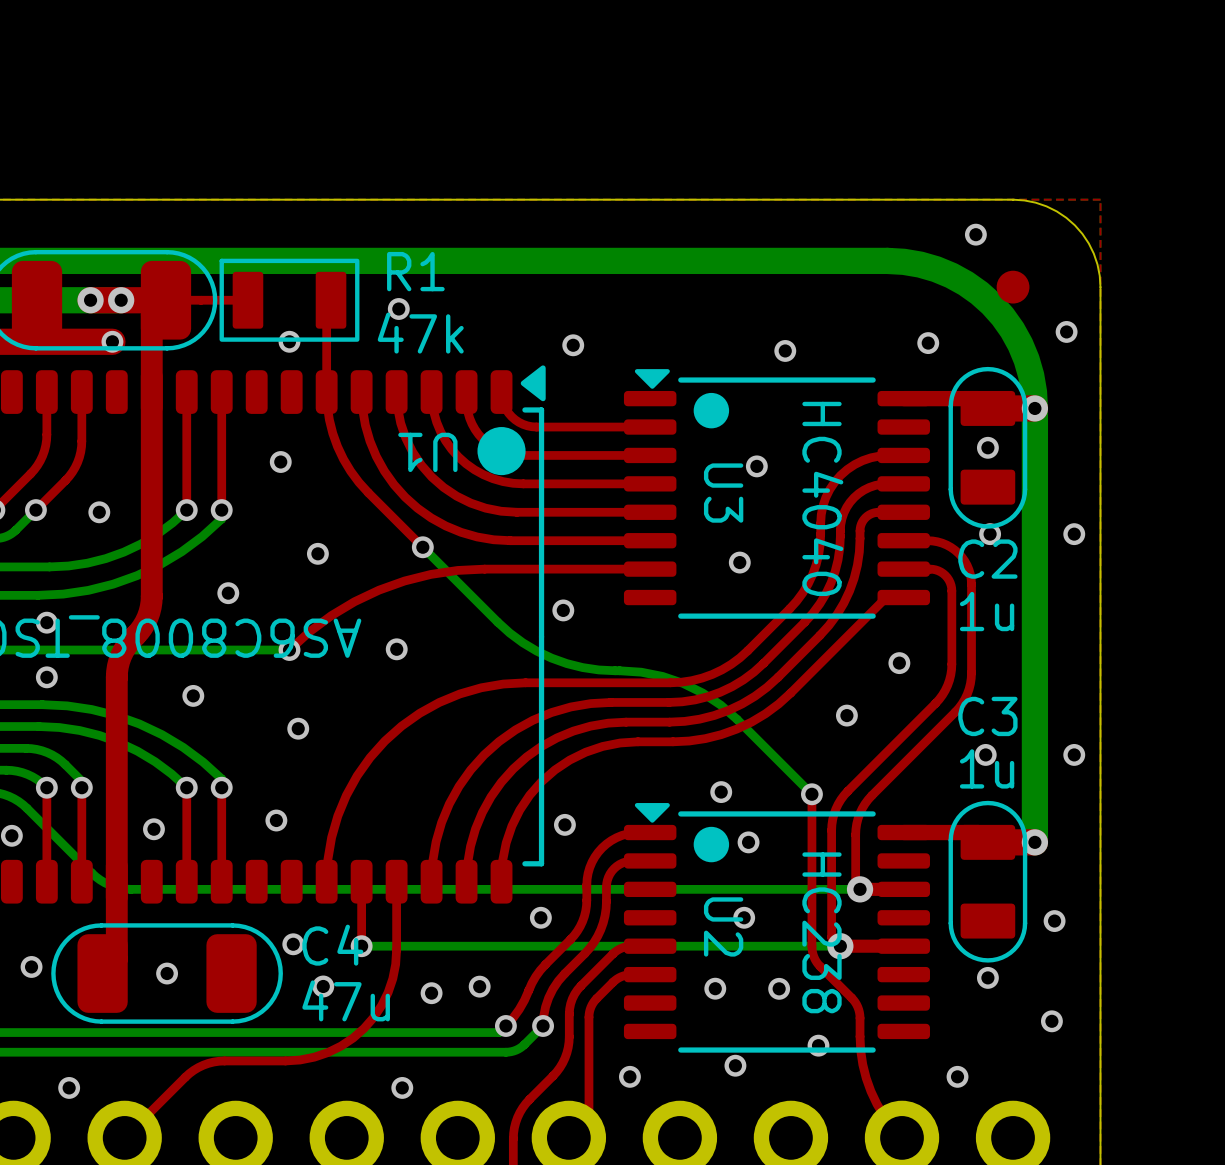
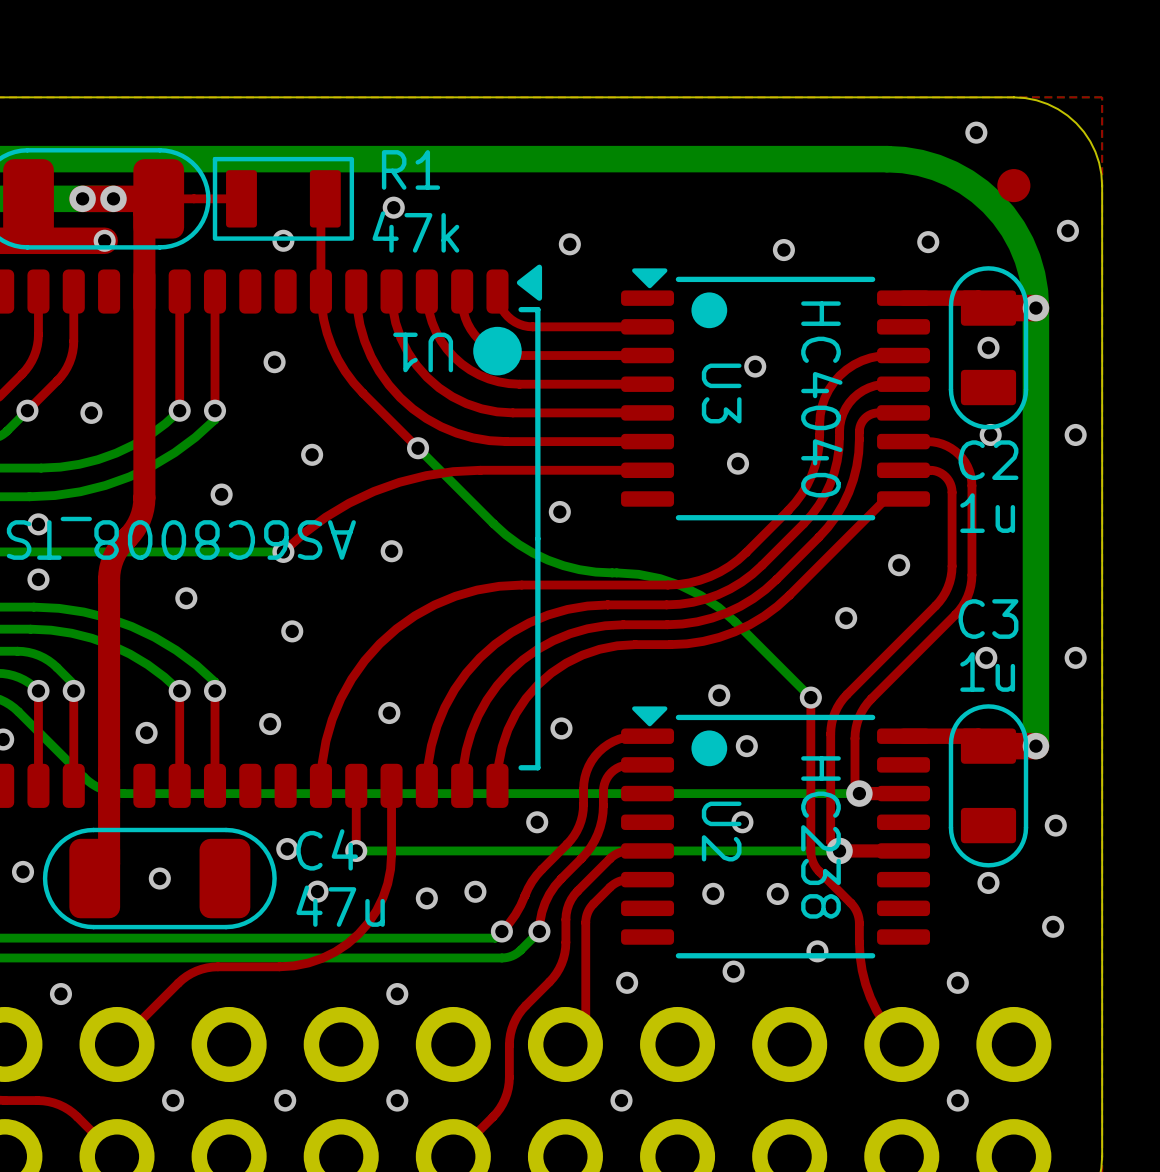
via: none -> (389, 713)

